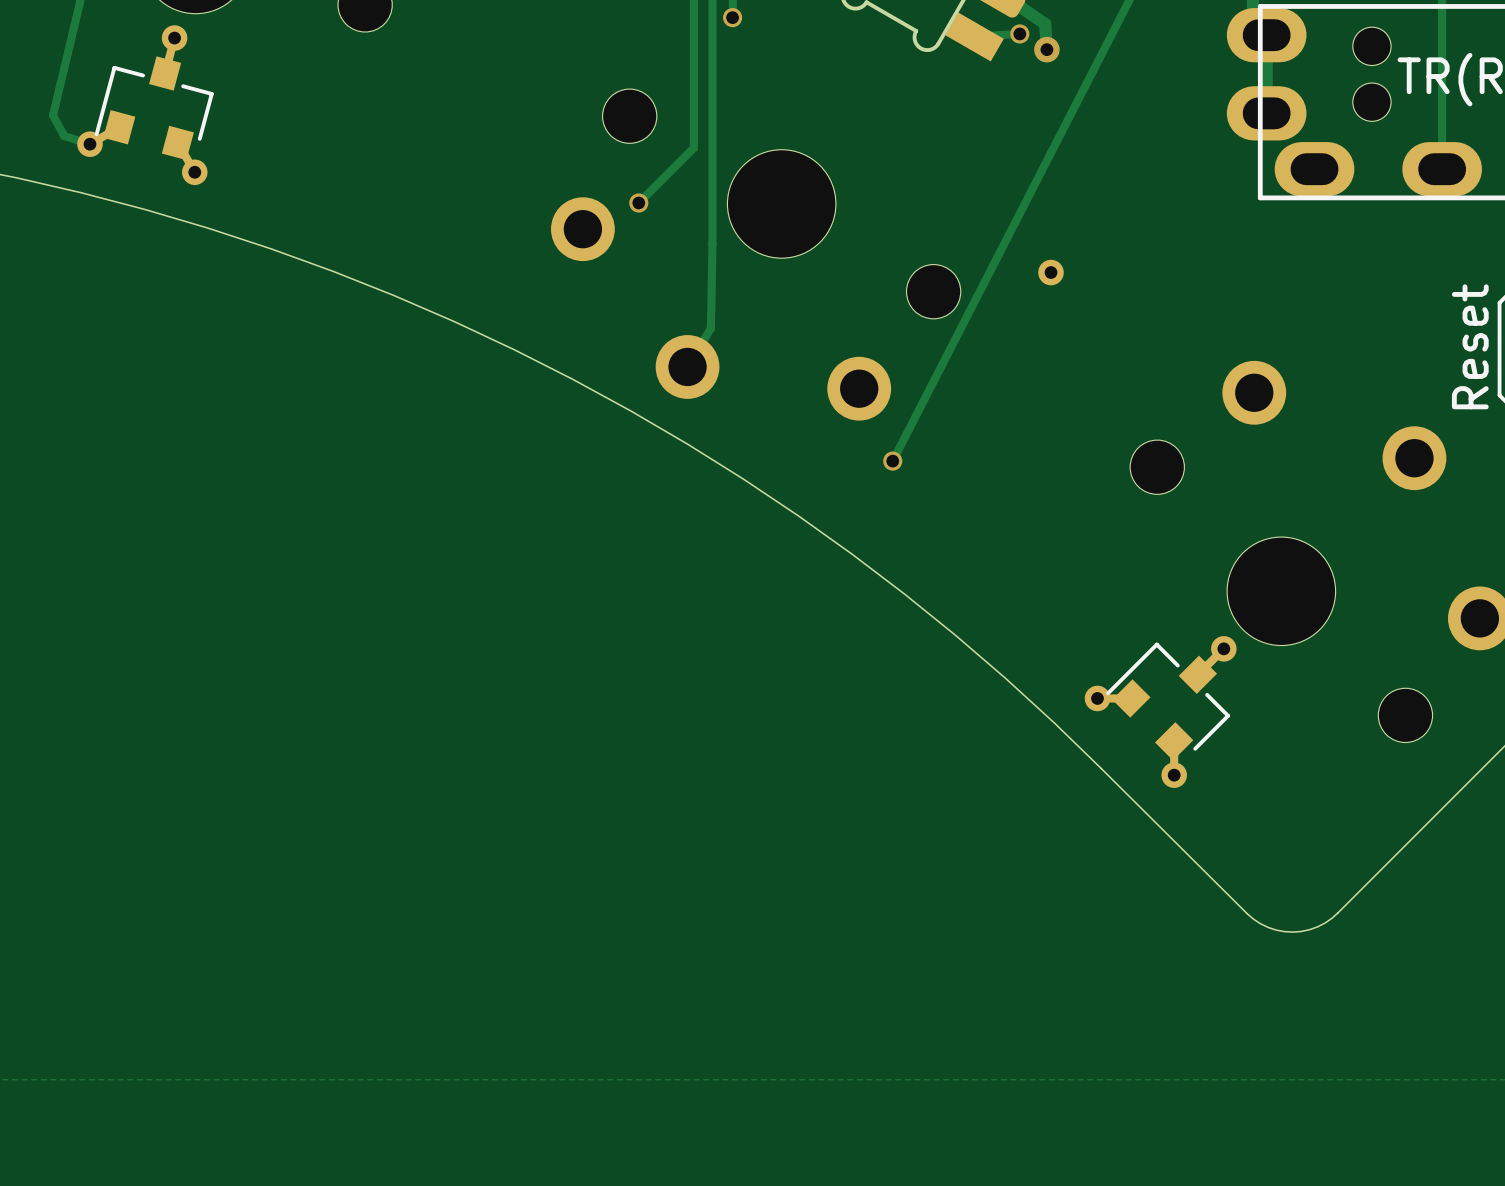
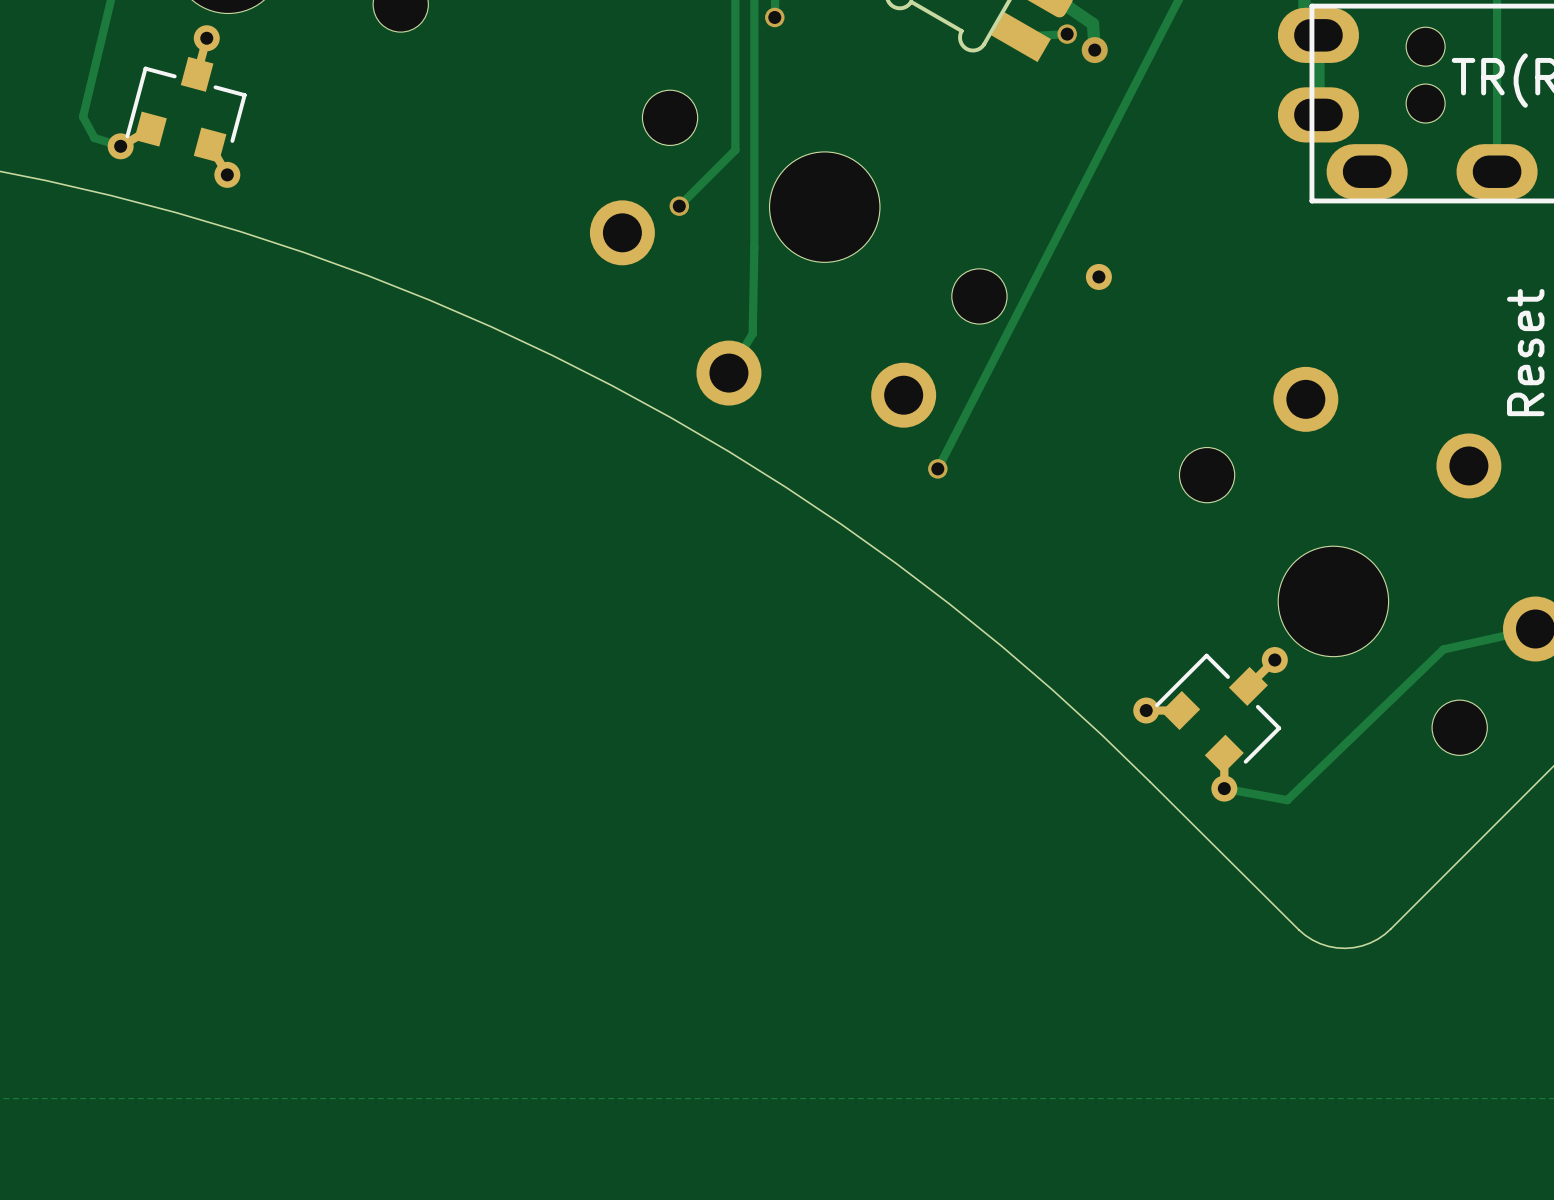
track: none -> (1535, 629) (1443, 649) (1287, 800) (1224, 788)

